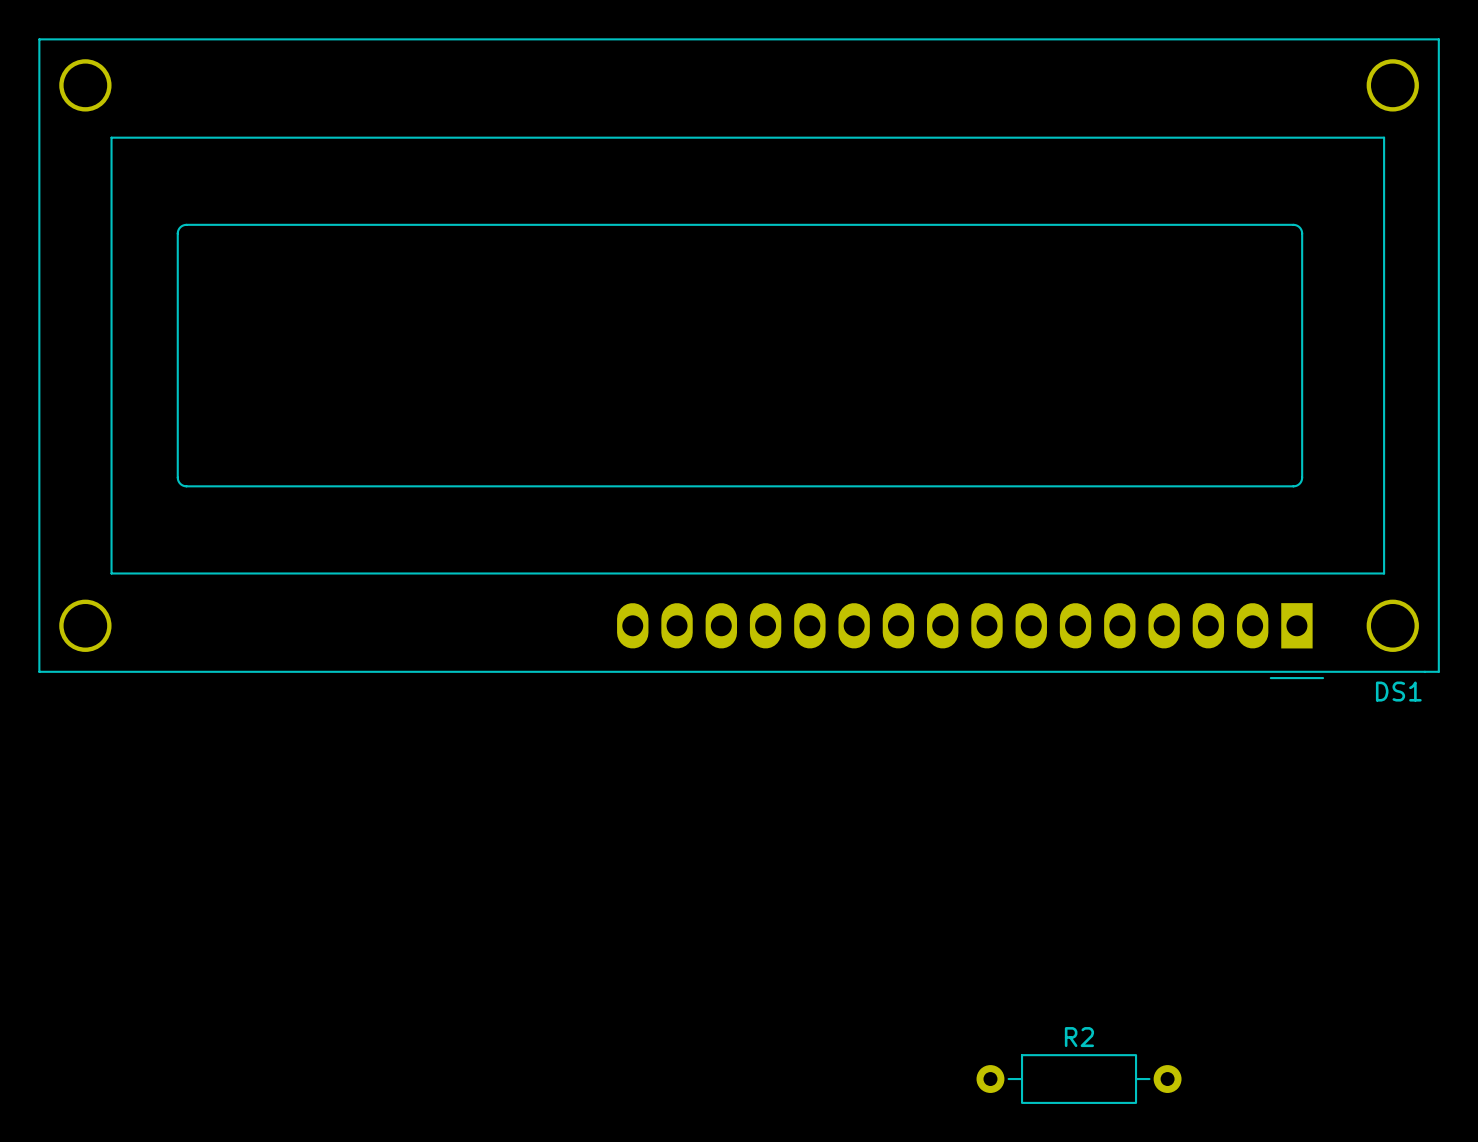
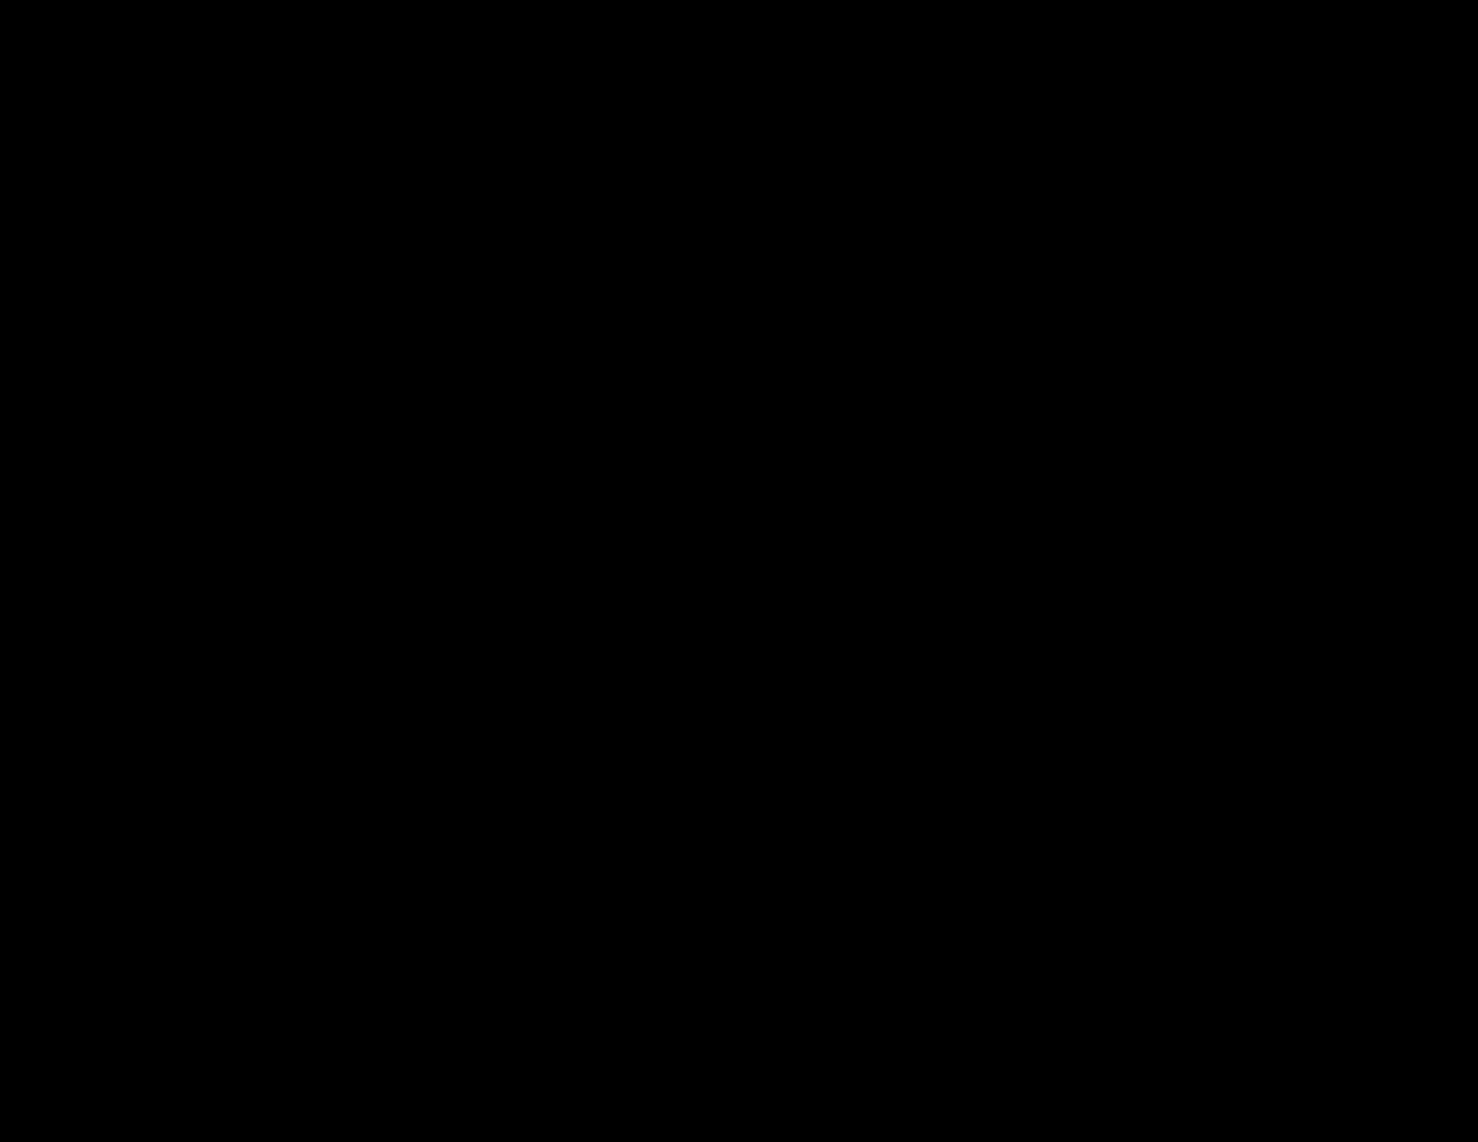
DS1: (739, 358) -> none
R2: (1079, 1079) -> none

